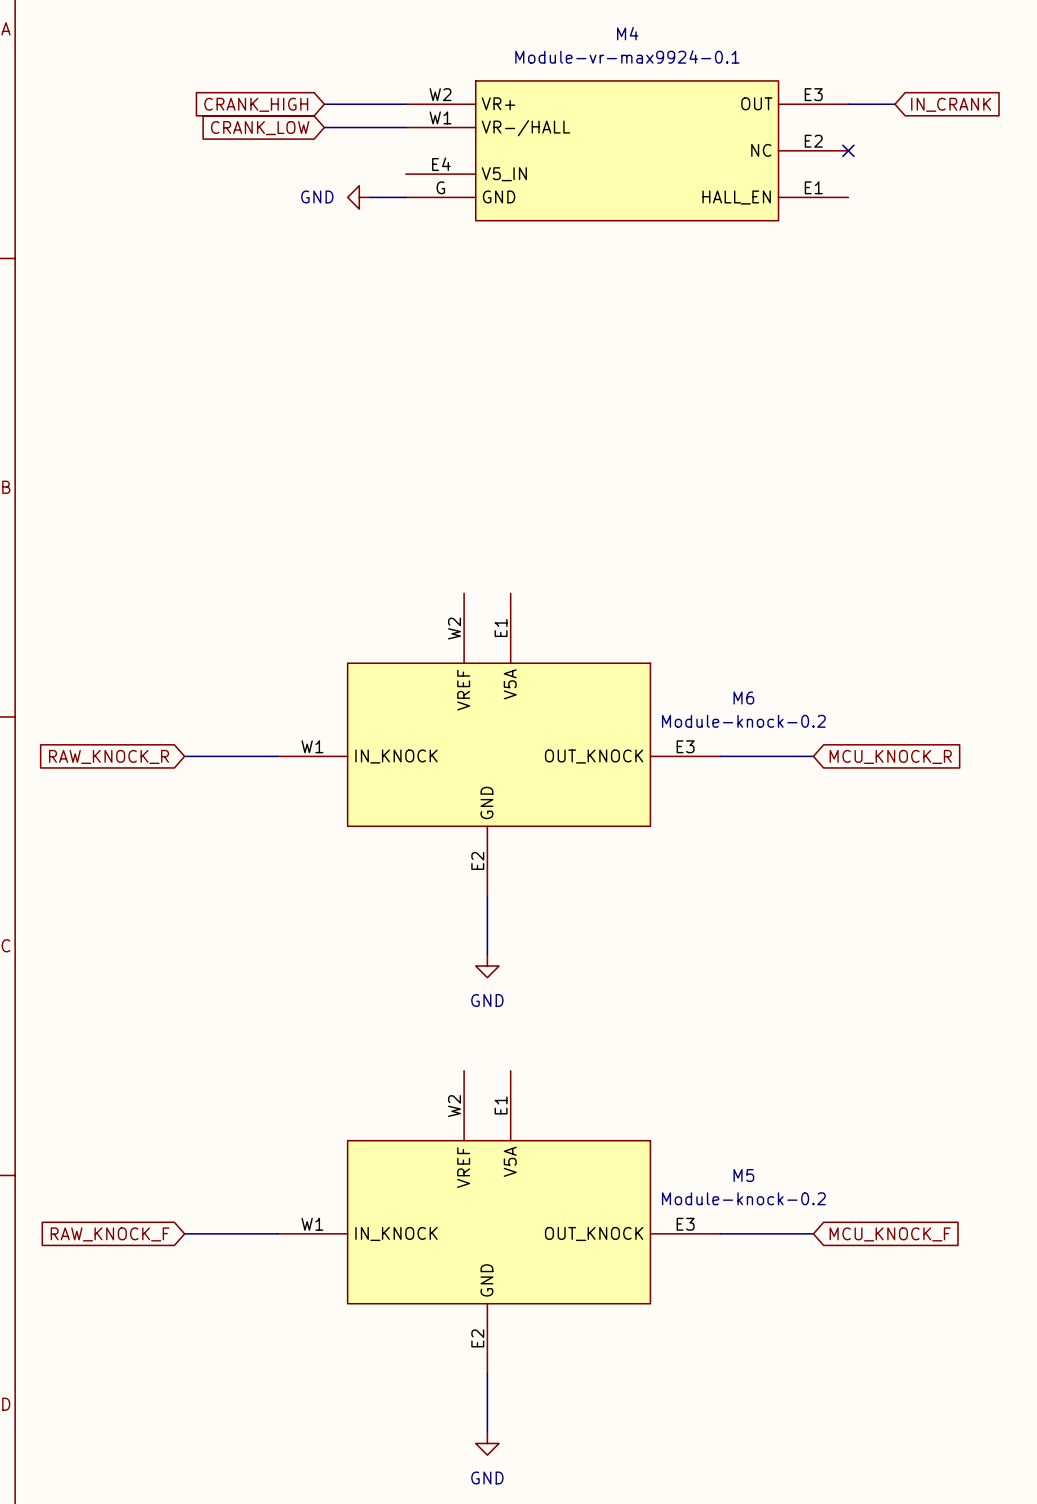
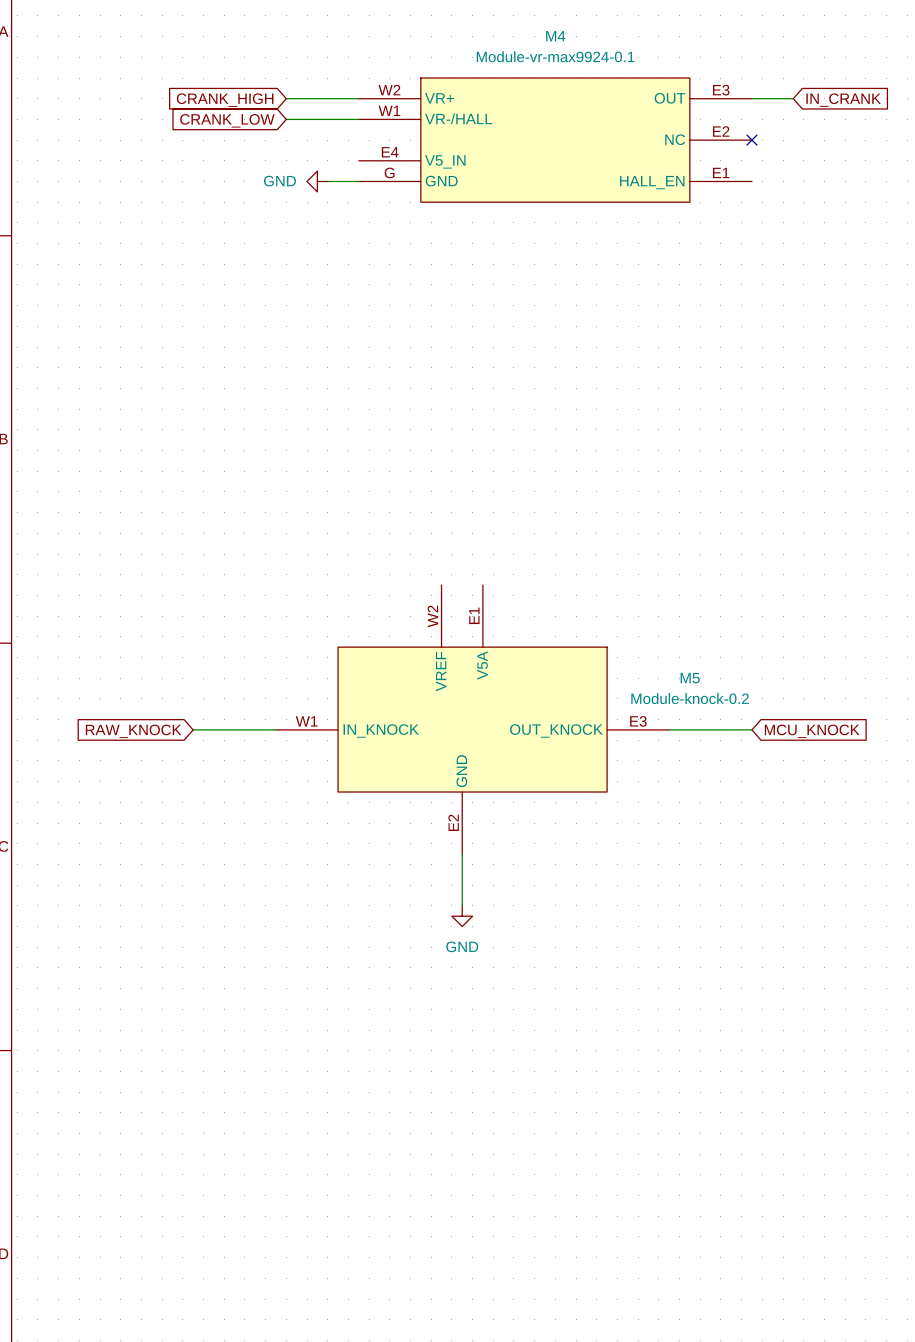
M6: Module-knock-0.2 (499, 744) -> none
global label: RAW_KNOCK_R (109, 756) -> none
wire: (184, 756) (277, 756) -> (193, 729) (275, 729)
wire: (720, 756) (813, 756) -> (669, 729) (751, 729)
global label: MCU_KNOCK_R (890, 756) -> none
global label: none -> RAW_KNOCK (133, 731)
global label: none -> MCU_KNOCK (812, 731)
wire: (487, 896) (487, 954) -> (462, 854) (462, 905)
power symbol position: GND (487, 966) -> GND (462, 916)
M5 position: (499, 1222) -> (472, 719)
wire: (184, 1233) (277, 1233) -> none
wire: (720, 1233) (813, 1233) -> none
global label: RAW_KNOCK_F (110, 1234) -> none
global label: MCU_KNOCK_F (890, 1234) -> none
wire: (487, 1373) (487, 1431) -> none
power symbol: GND (487, 1443) -> none

